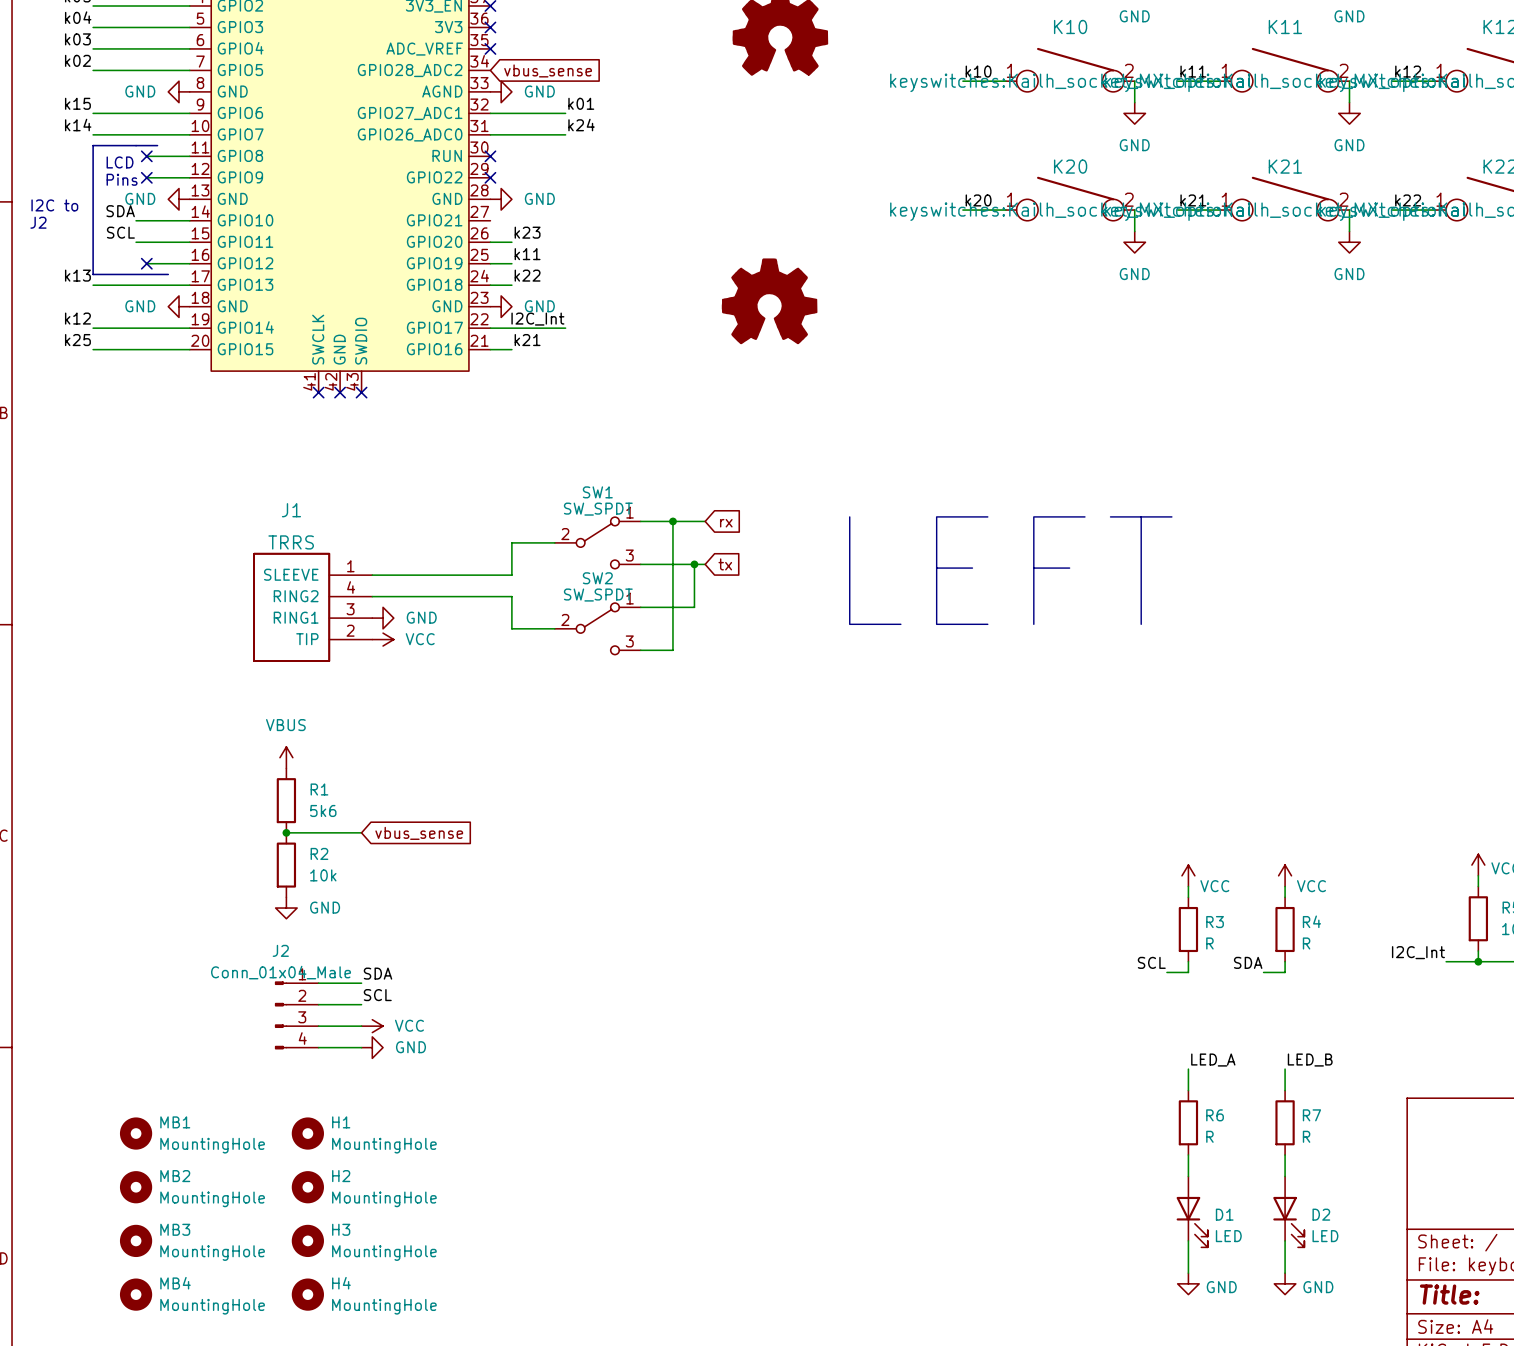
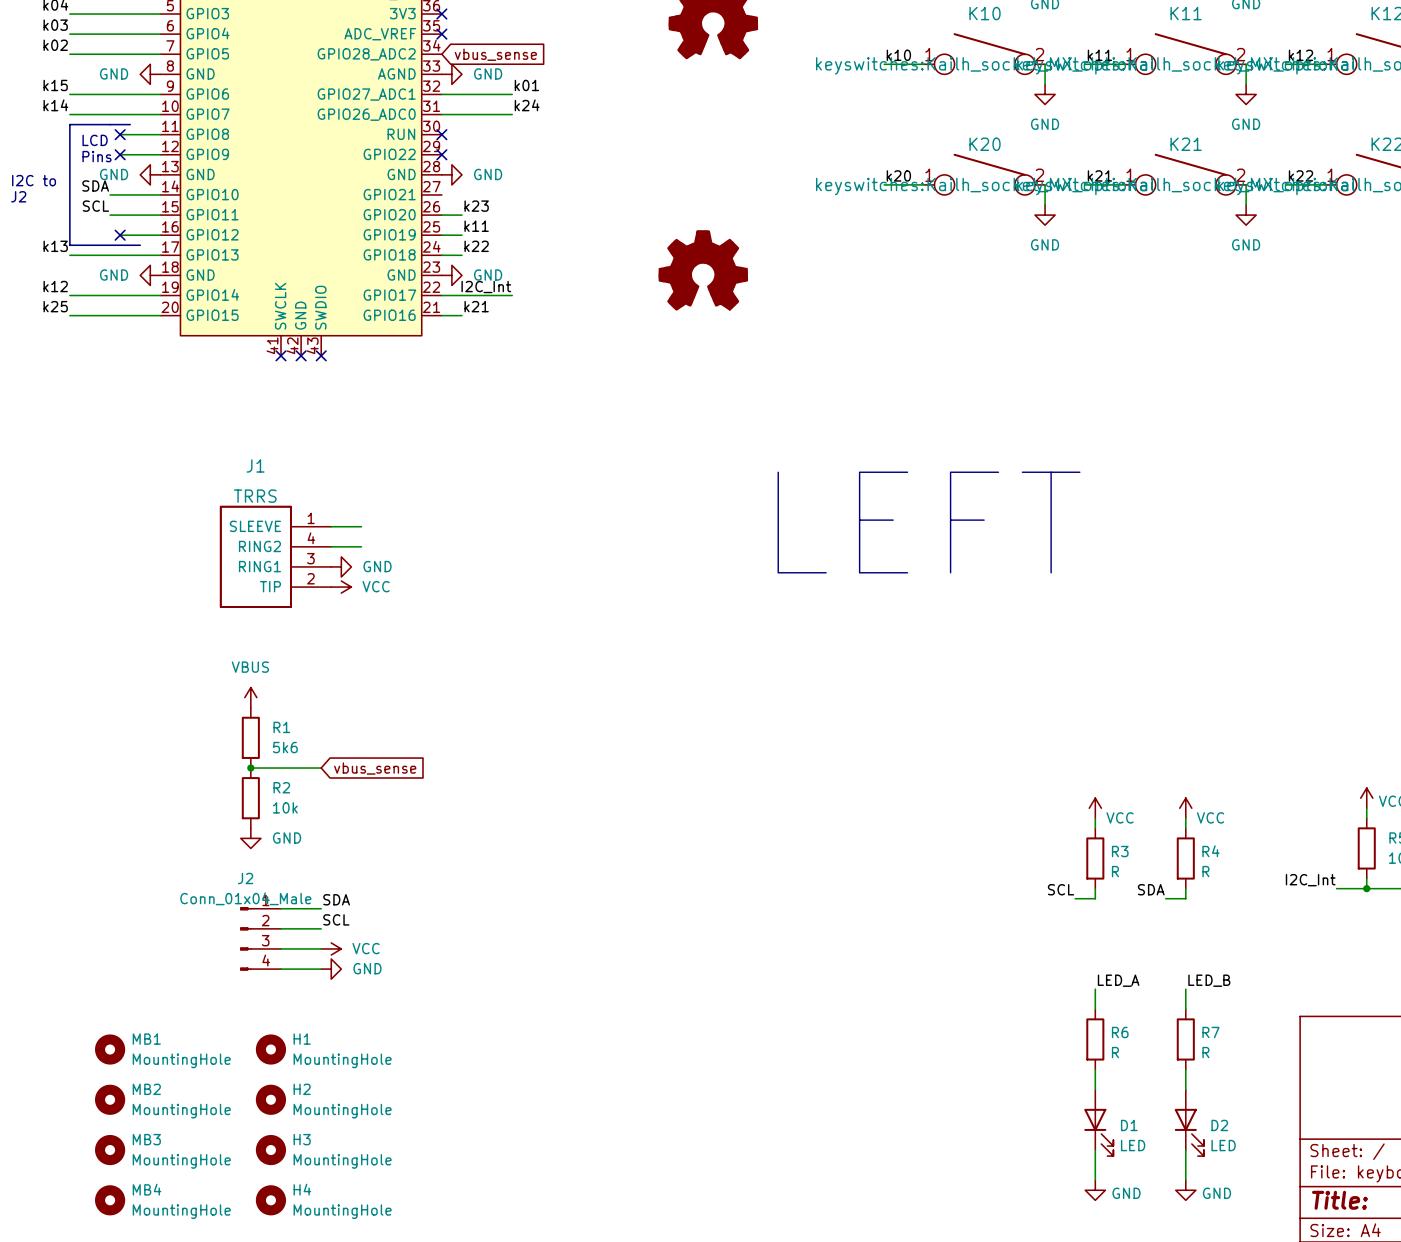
wire: (640, 521) (705, 521) -> none
wire: (672, 521) (672, 650) (640, 650) -> none
junction: (672, 521) -> none
global label: rx (726, 523) -> none
wire: (554, 542) (511, 542) (511, 575) (404, 575) -> none
SW1: SW_SPDT (597, 542) -> none
wire: (640, 564) (705, 564) -> none
wire: (694, 564) (694, 607) (640, 607) -> none
junction: (694, 564) -> none
global label: tx (725, 564) -> none
wire: (404, 596) (511, 596) (511, 628) (554, 628) -> none
SW2: SW_SPDT (597, 628) -> none

